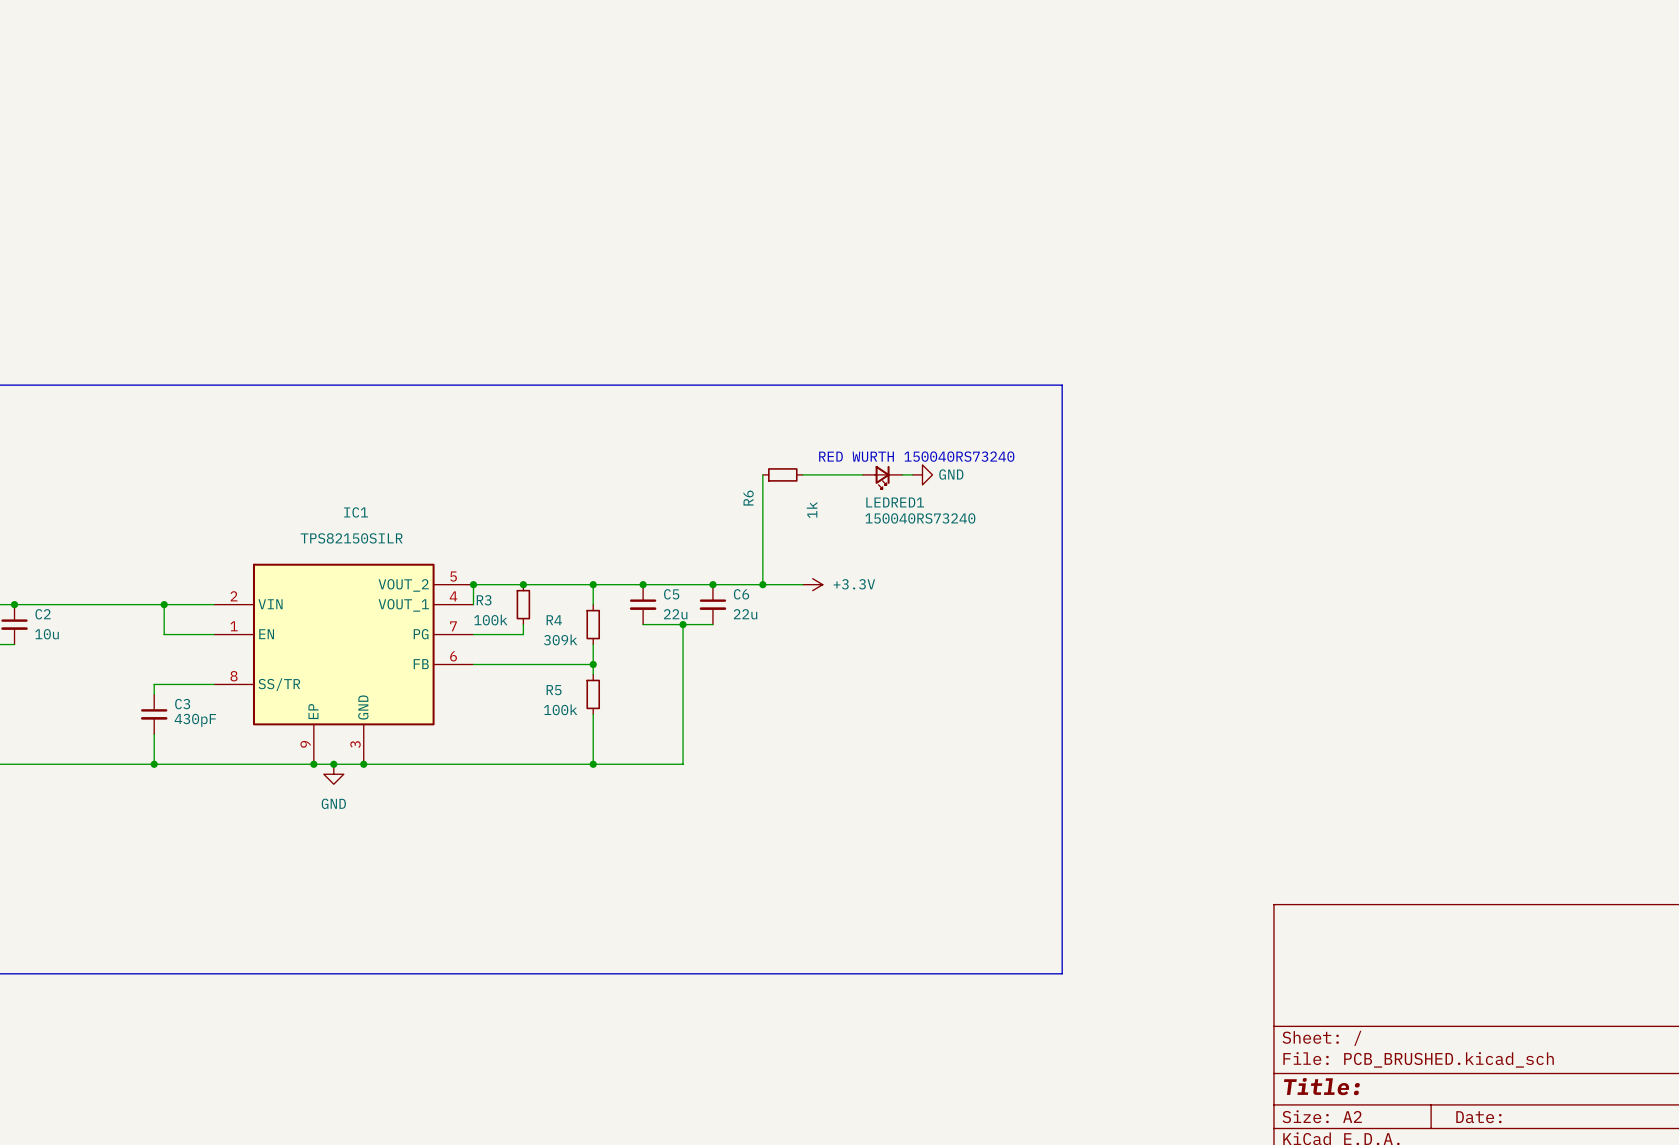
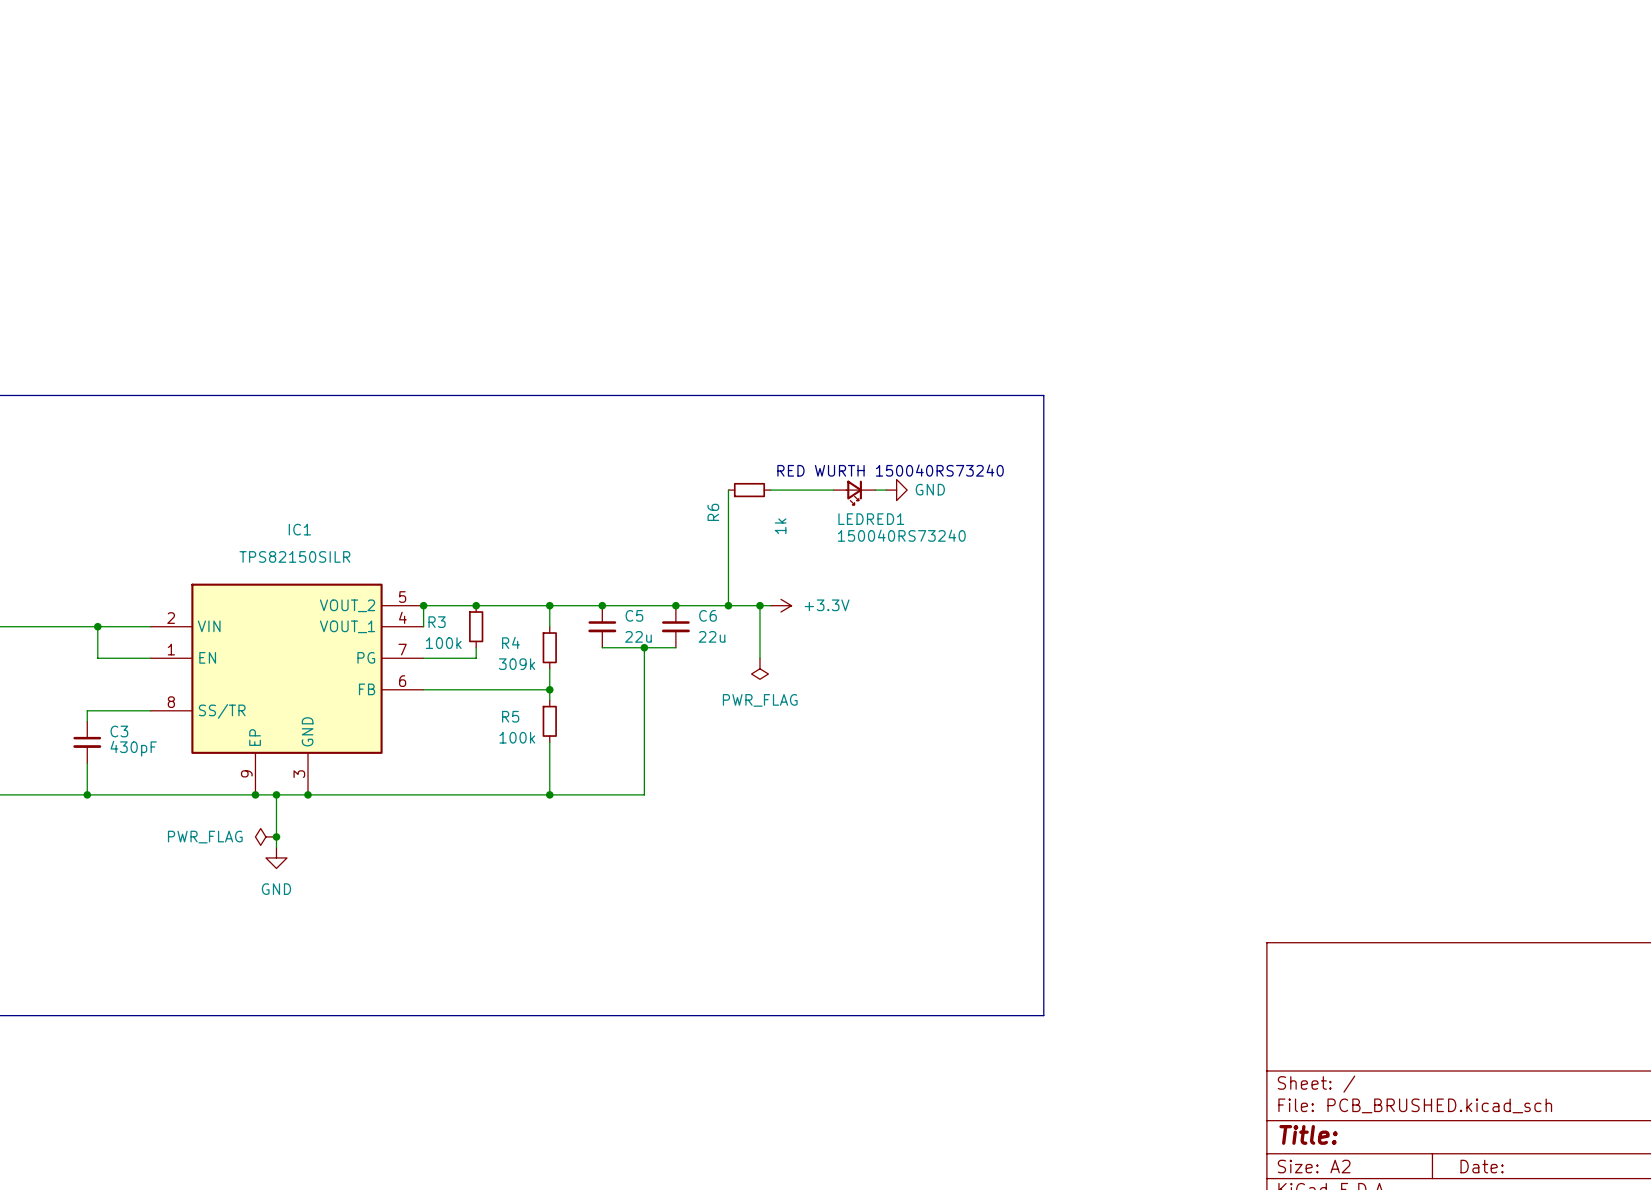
wire: none -> (759, 605) (759, 658)
junction: none -> (759, 605)
power symbol: none -> PWR_FLAG (759, 668)
wire: none -> (276, 794) (276, 847)
power symbol position: GND (333, 774) -> GND (276, 857)
power symbol: none -> PWR_FLAG (265, 836)
junction: none -> (276, 836)

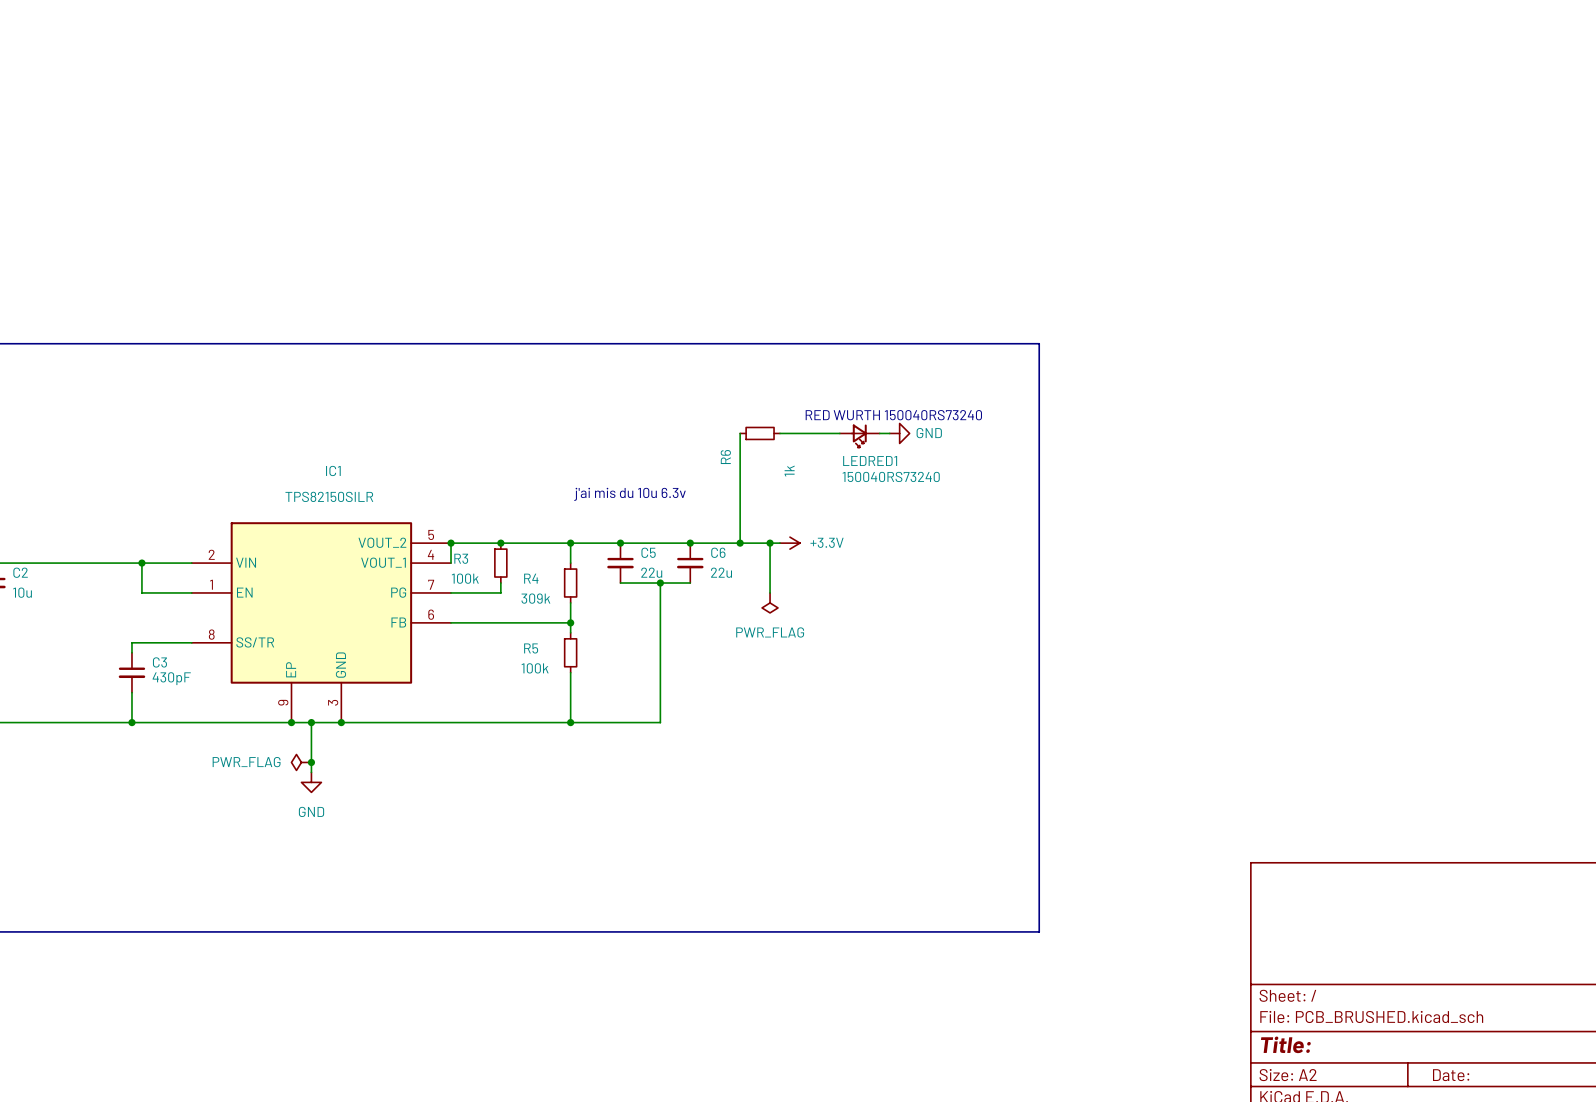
text: none -> j'ai mis du 10u 6.3v (630, 494)

